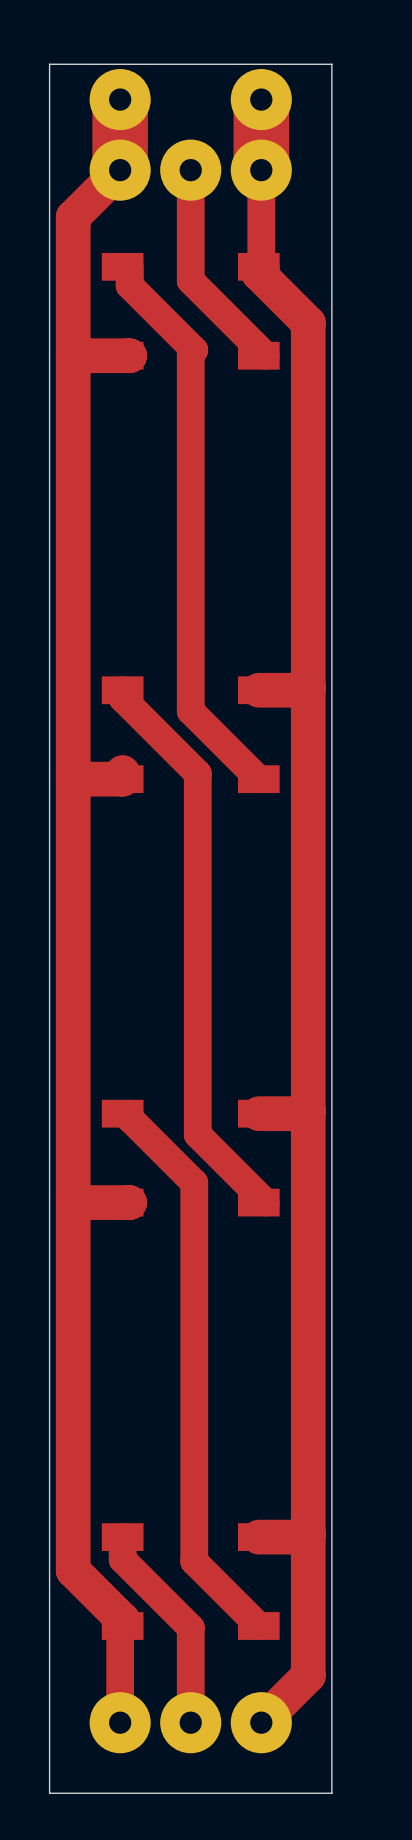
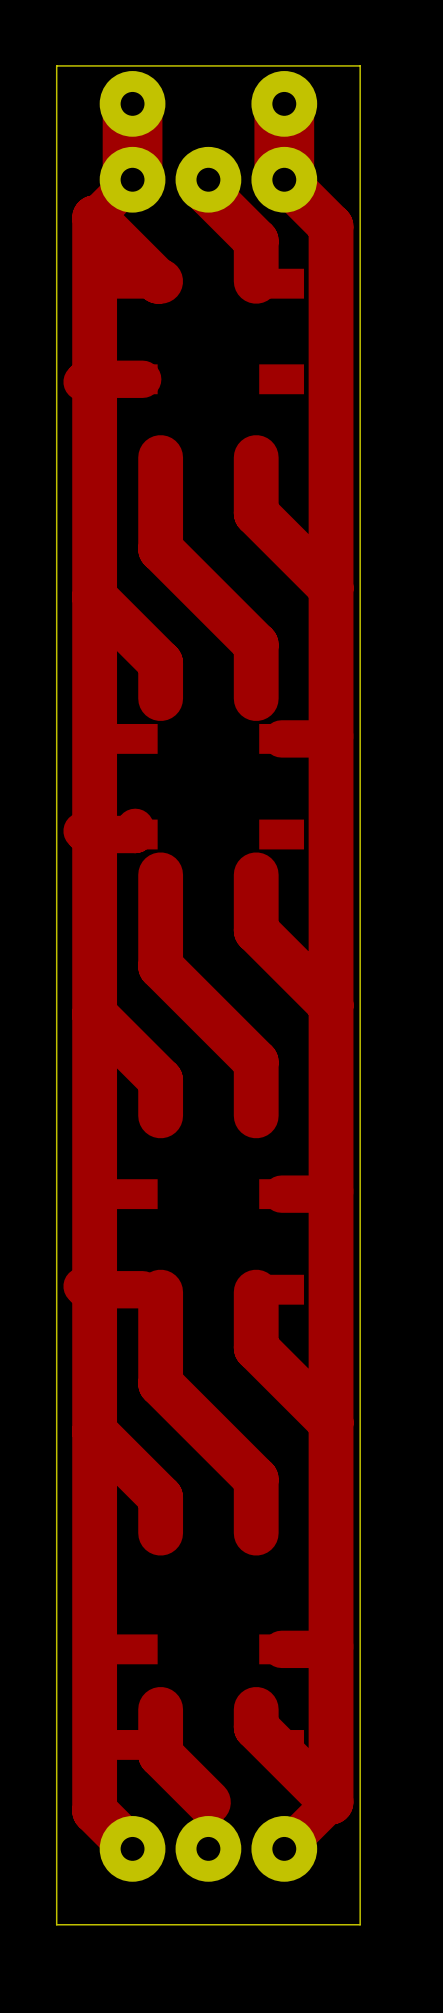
top track: (261, 170) (261, 262) (265, 266) -> (284, 179) (331, 226) (331, 1802) (256, 1727) (256, 1709)
top track: (190, 182) (190, 280) (265, 355) -> (208, 193) (256, 240) (256, 281)
top track: (84, 205) (73, 217) (73, 1570) (122, 1620) (122, 1626) (120, 1628) (120, 1722) -> (160, 281) (158, 281) (94, 217) (94, 1810) (132, 1848)
top track: (129, 266) (129, 285) (194, 350) (190, 353) (190, 711) (258, 779) -> none
top track: (258, 266) (258, 273) (308, 322) (308, 1675) (304, 1679) -> none
top track: none -> (160, 457) (160, 549) (256, 644) (256, 698)
top track: none -> (256, 457) (256, 513) (331, 588)
top track: none -> (94, 597) (160, 663) (160, 698)
top track: (122, 690) (122, 698) (197, 773) (197, 1134) (265, 1202) -> none
top track: none -> (160, 874) (160, 966) (256, 1062) (256, 1115)
top track: none -> (256, 874) (256, 930) (331, 1005)
top track: none -> (94, 1014) (160, 1080) (160, 1115)
top track: (129, 1113) (129, 1118) (194, 1182) (194, 1561) (258, 1626) -> none
top track: none -> (160, 1292) (160, 1383) (256, 1479) (256, 1533)
top track: none -> (256, 1292) (256, 1347) (331, 1422)
top track: none -> (94, 1431) (160, 1497) (160, 1533)
top track: (122, 1537) (122, 1559) (190, 1627) (190, 1679) -> (160, 1709) (160, 1754) (208, 1802)

